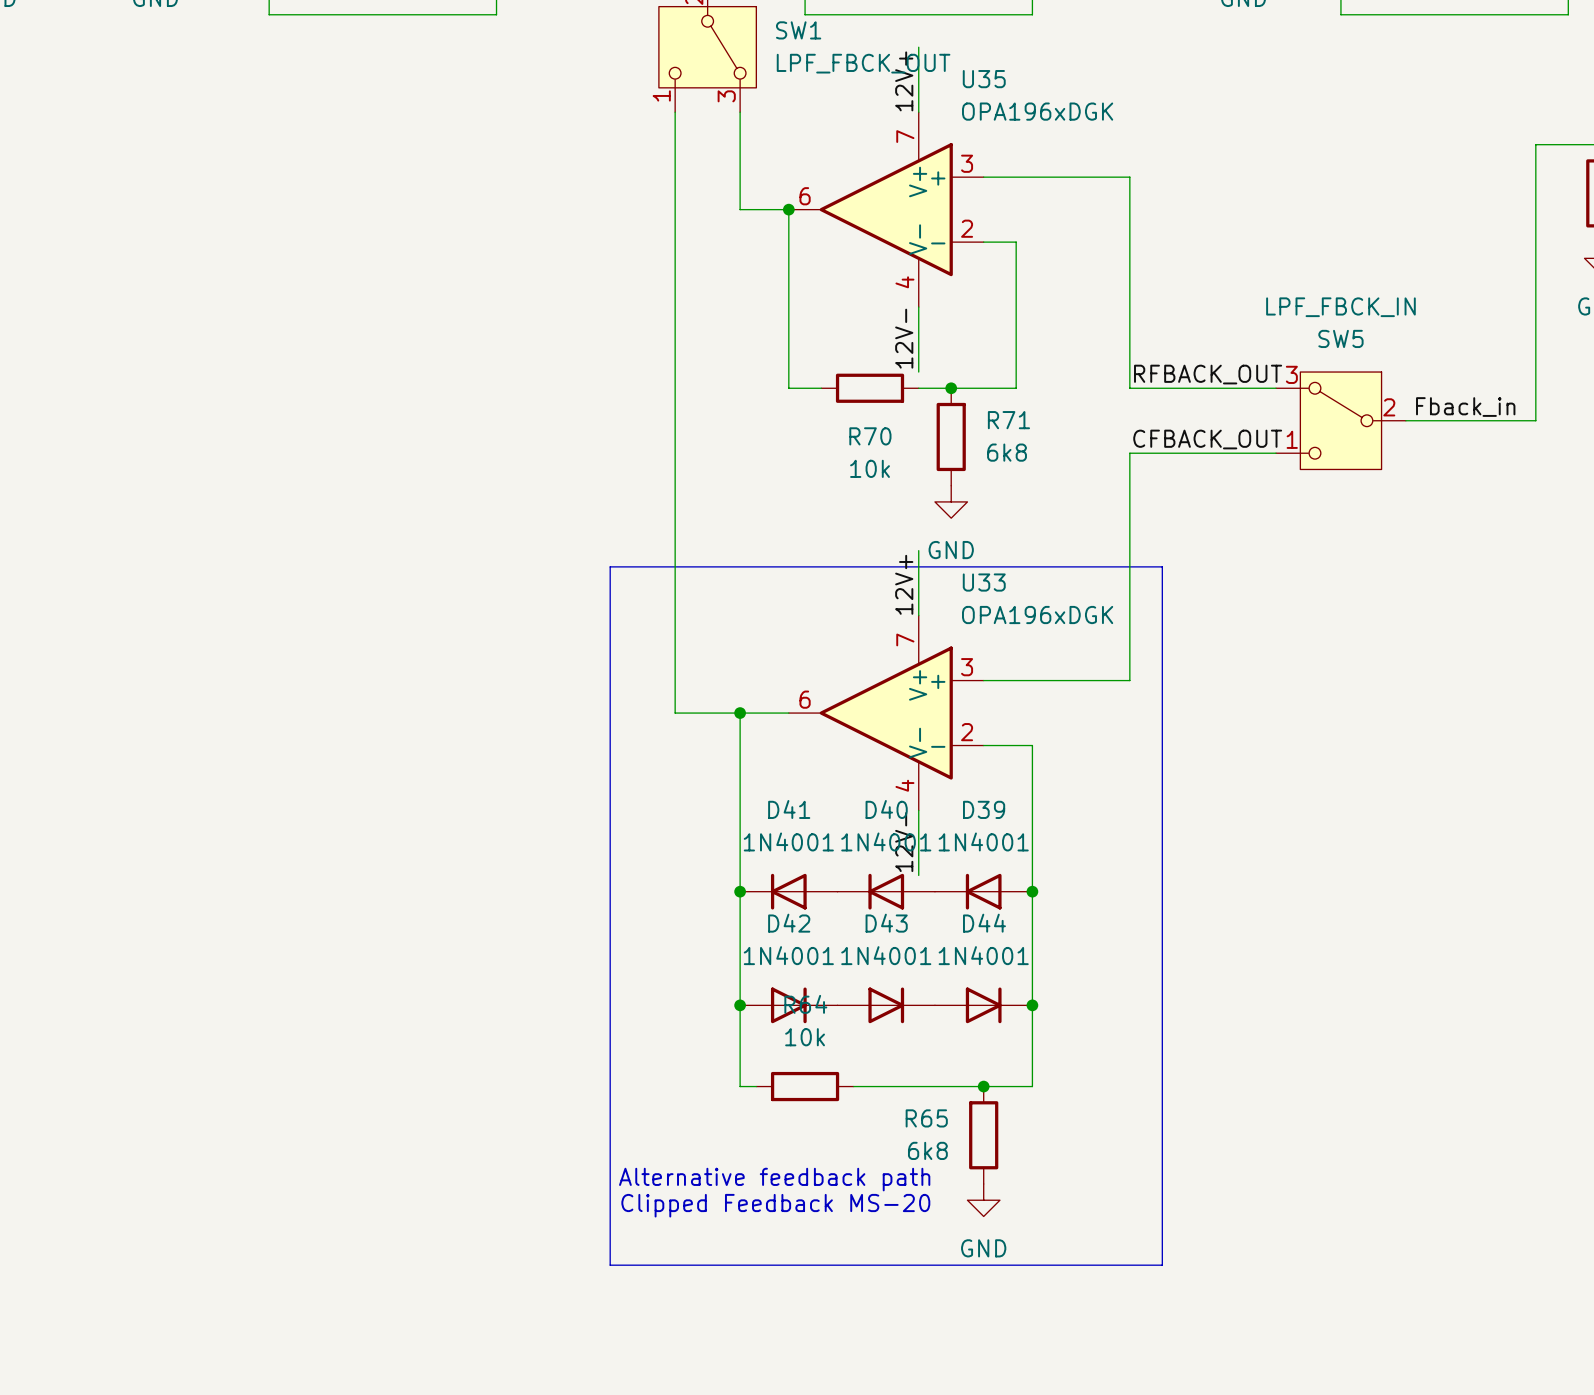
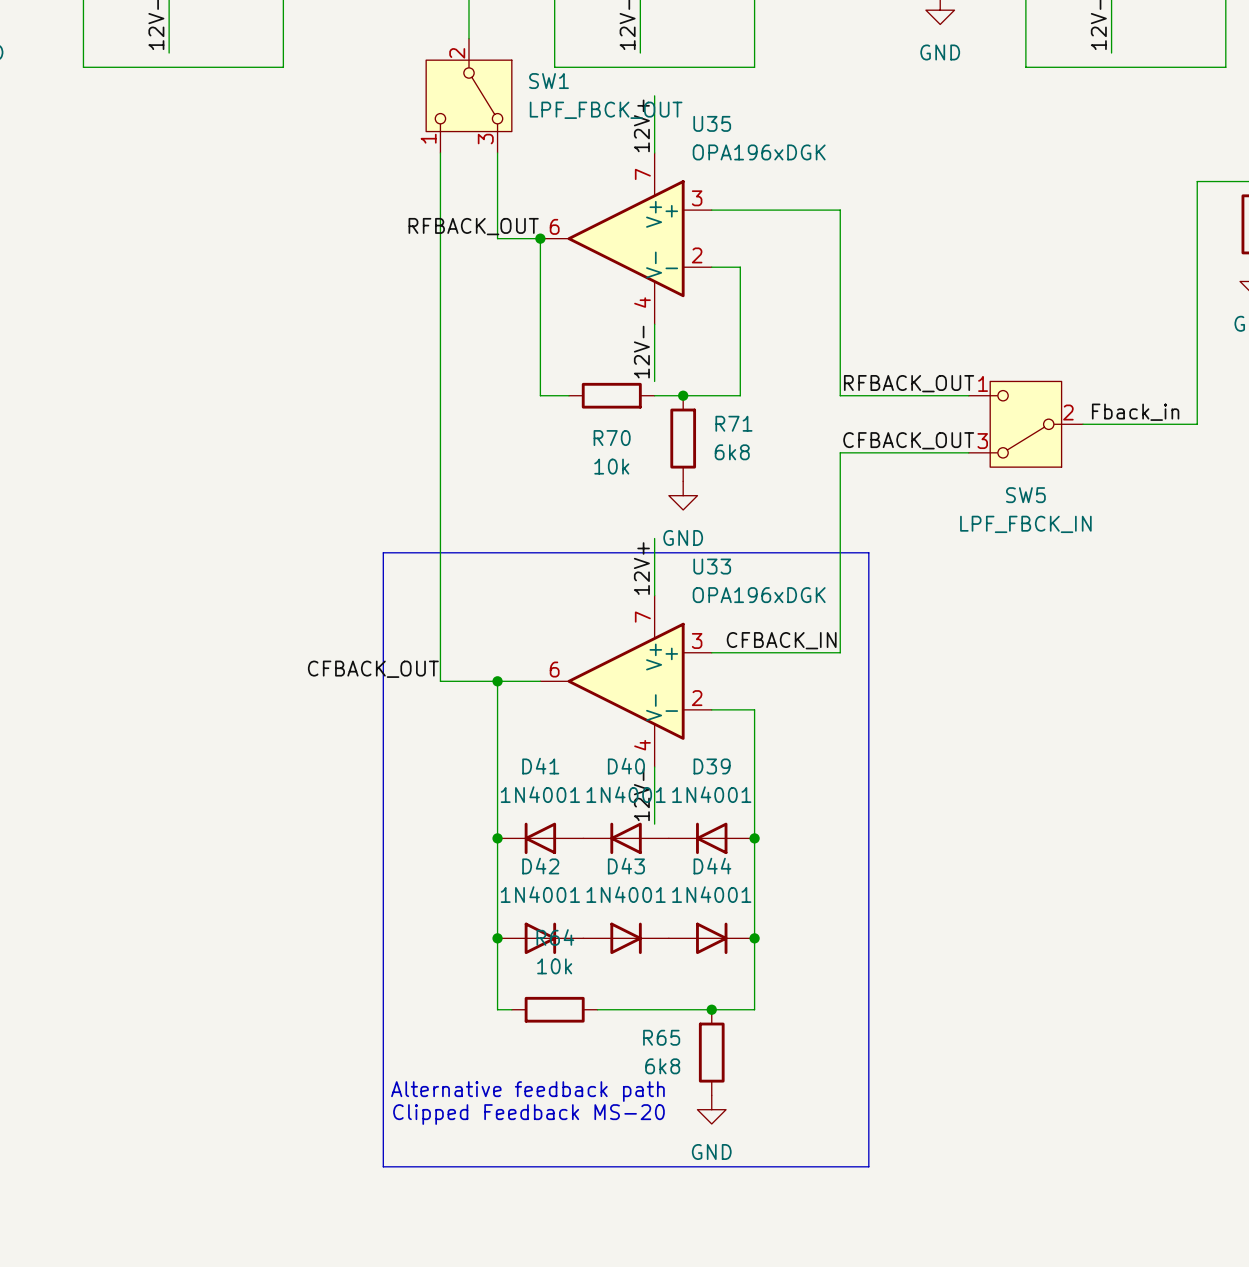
label: none -> RFBACK_OUT (473, 226)
SW5 flip: as is (1340, 420) -> up-down (1025, 424)
label: none -> CFBACK_IN (781, 640)
label: none -> CFBACK_OUT (373, 669)

